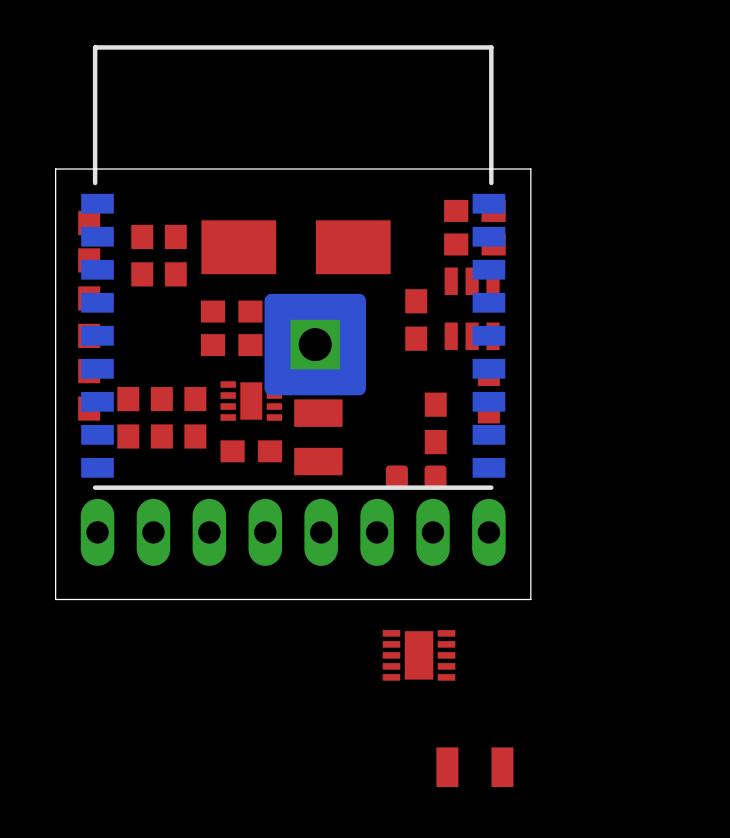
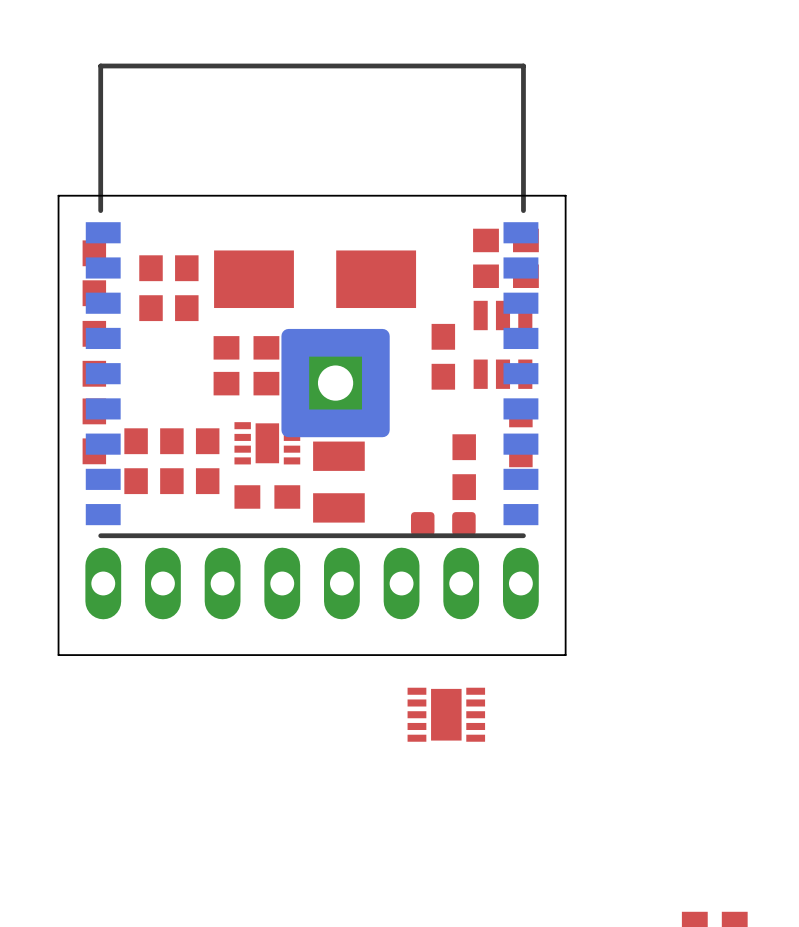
part: (474, 767) -> none

